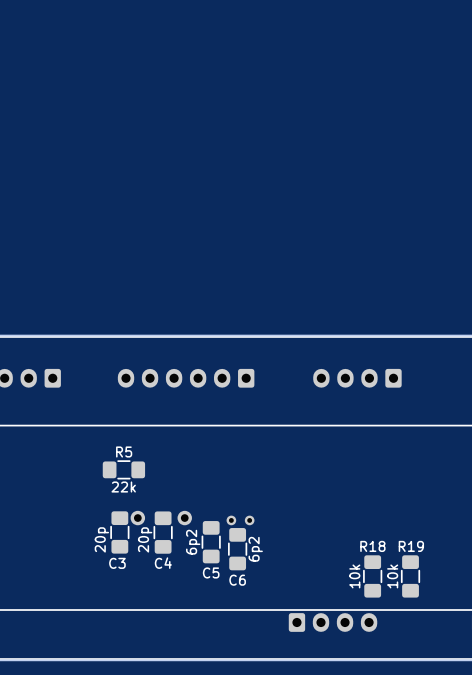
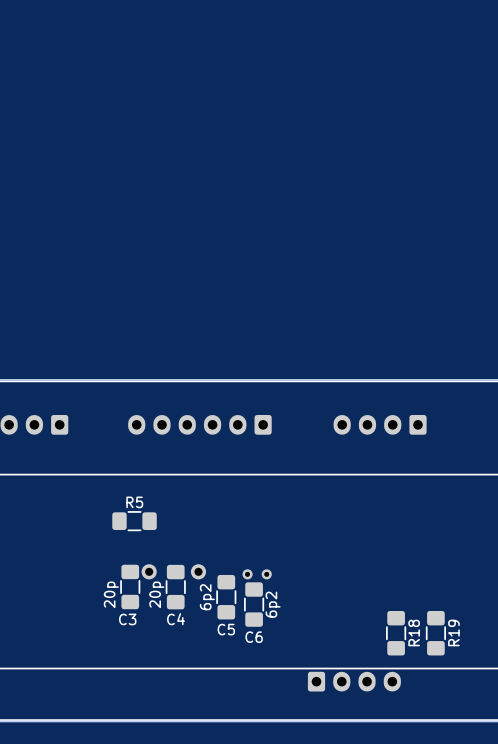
R5 value: 22k (123, 487) -> none
R18 name rotation: 0° (372, 546) -> 90° counterclockwise (414, 632)
R18 name position: R18 (372, 546) -> R18 (414, 632)
R19 name rotation: 0° (411, 546) -> 90° counterclockwise (453, 632)
R19 name position: R19 (411, 546) -> R19 (453, 632)
R18 value: 10k (354, 576) -> none
R19 value: 10k (392, 576) -> none

